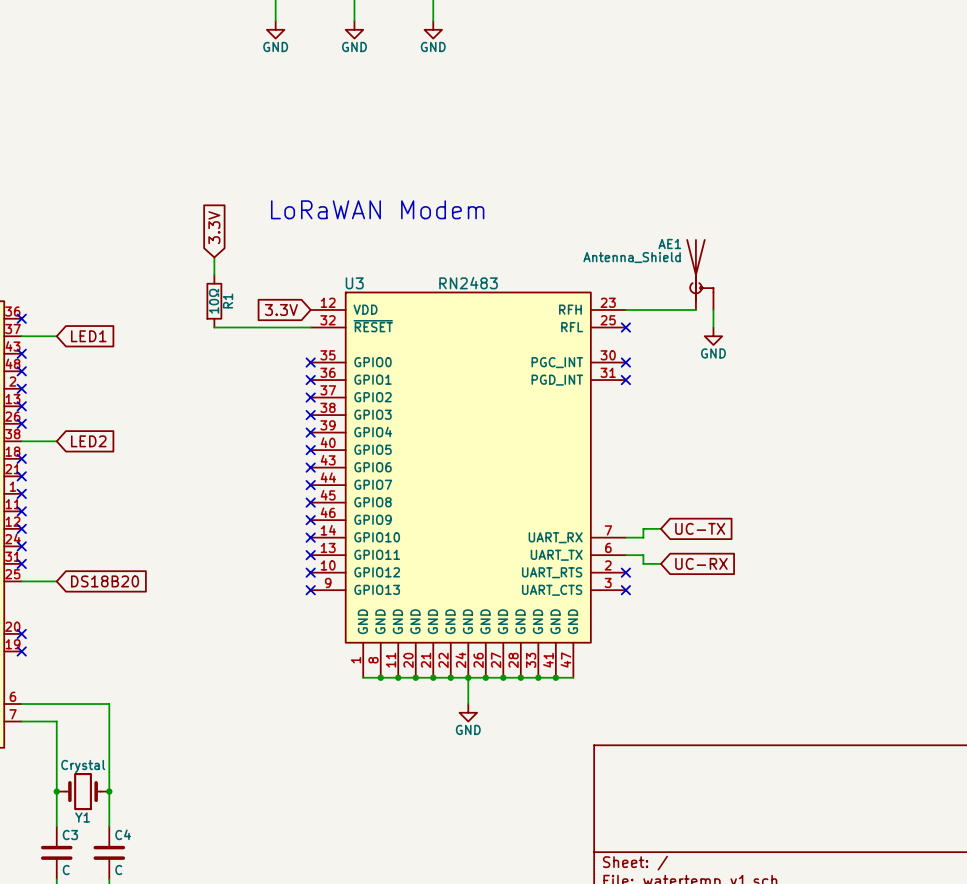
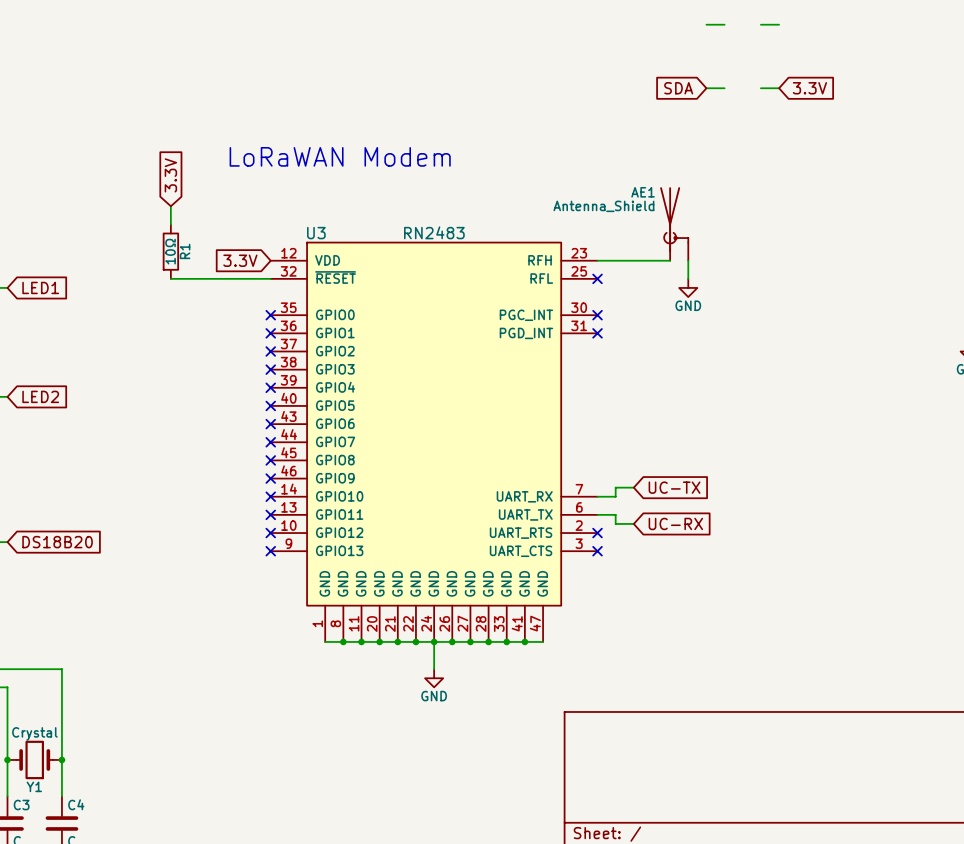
wire: none -> (706, 24) (724, 24)
wire: none -> (760, 24) (779, 24)
global label: none -> SDA (678, 88)
wire: none -> (706, 88) (724, 88)
wire: none -> (760, 88) (779, 88)
global label: none -> 3.3V (809, 88)

